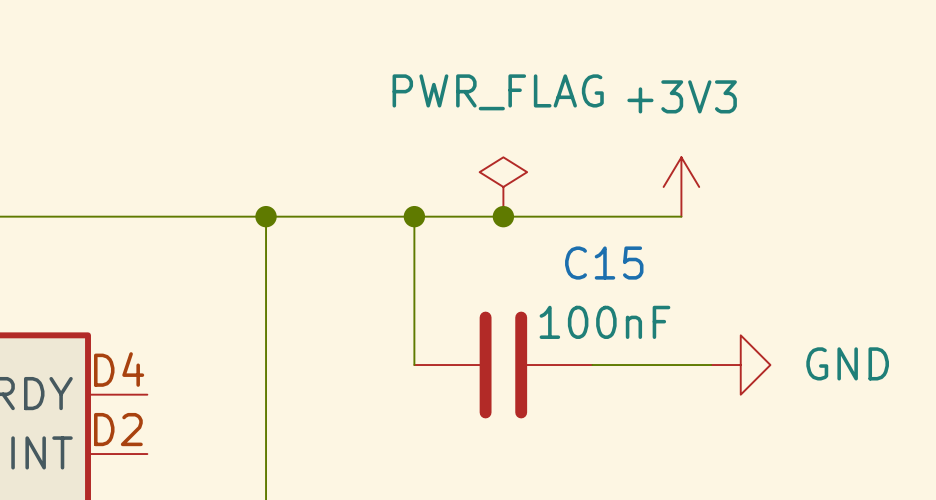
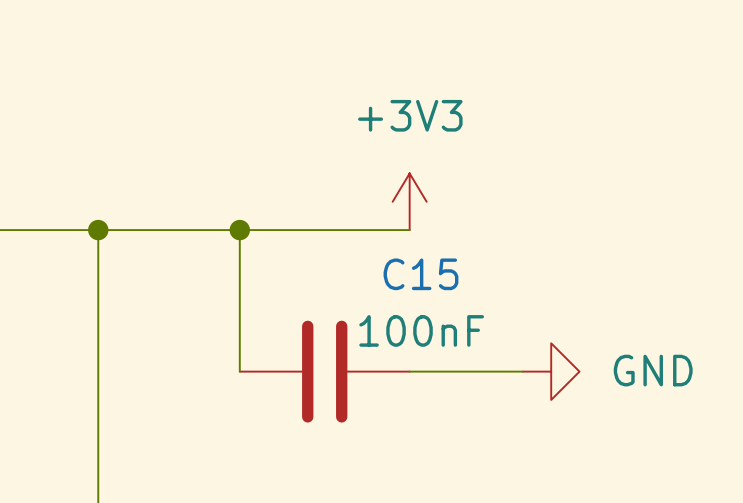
power symbol: PWR_FLAG (503, 186) -> none
power symbol position: +3V3 (681, 186) -> +3V3 (409, 201)
junction: (503, 216) -> none
wire: (592, 216) (681, 216) -> none

